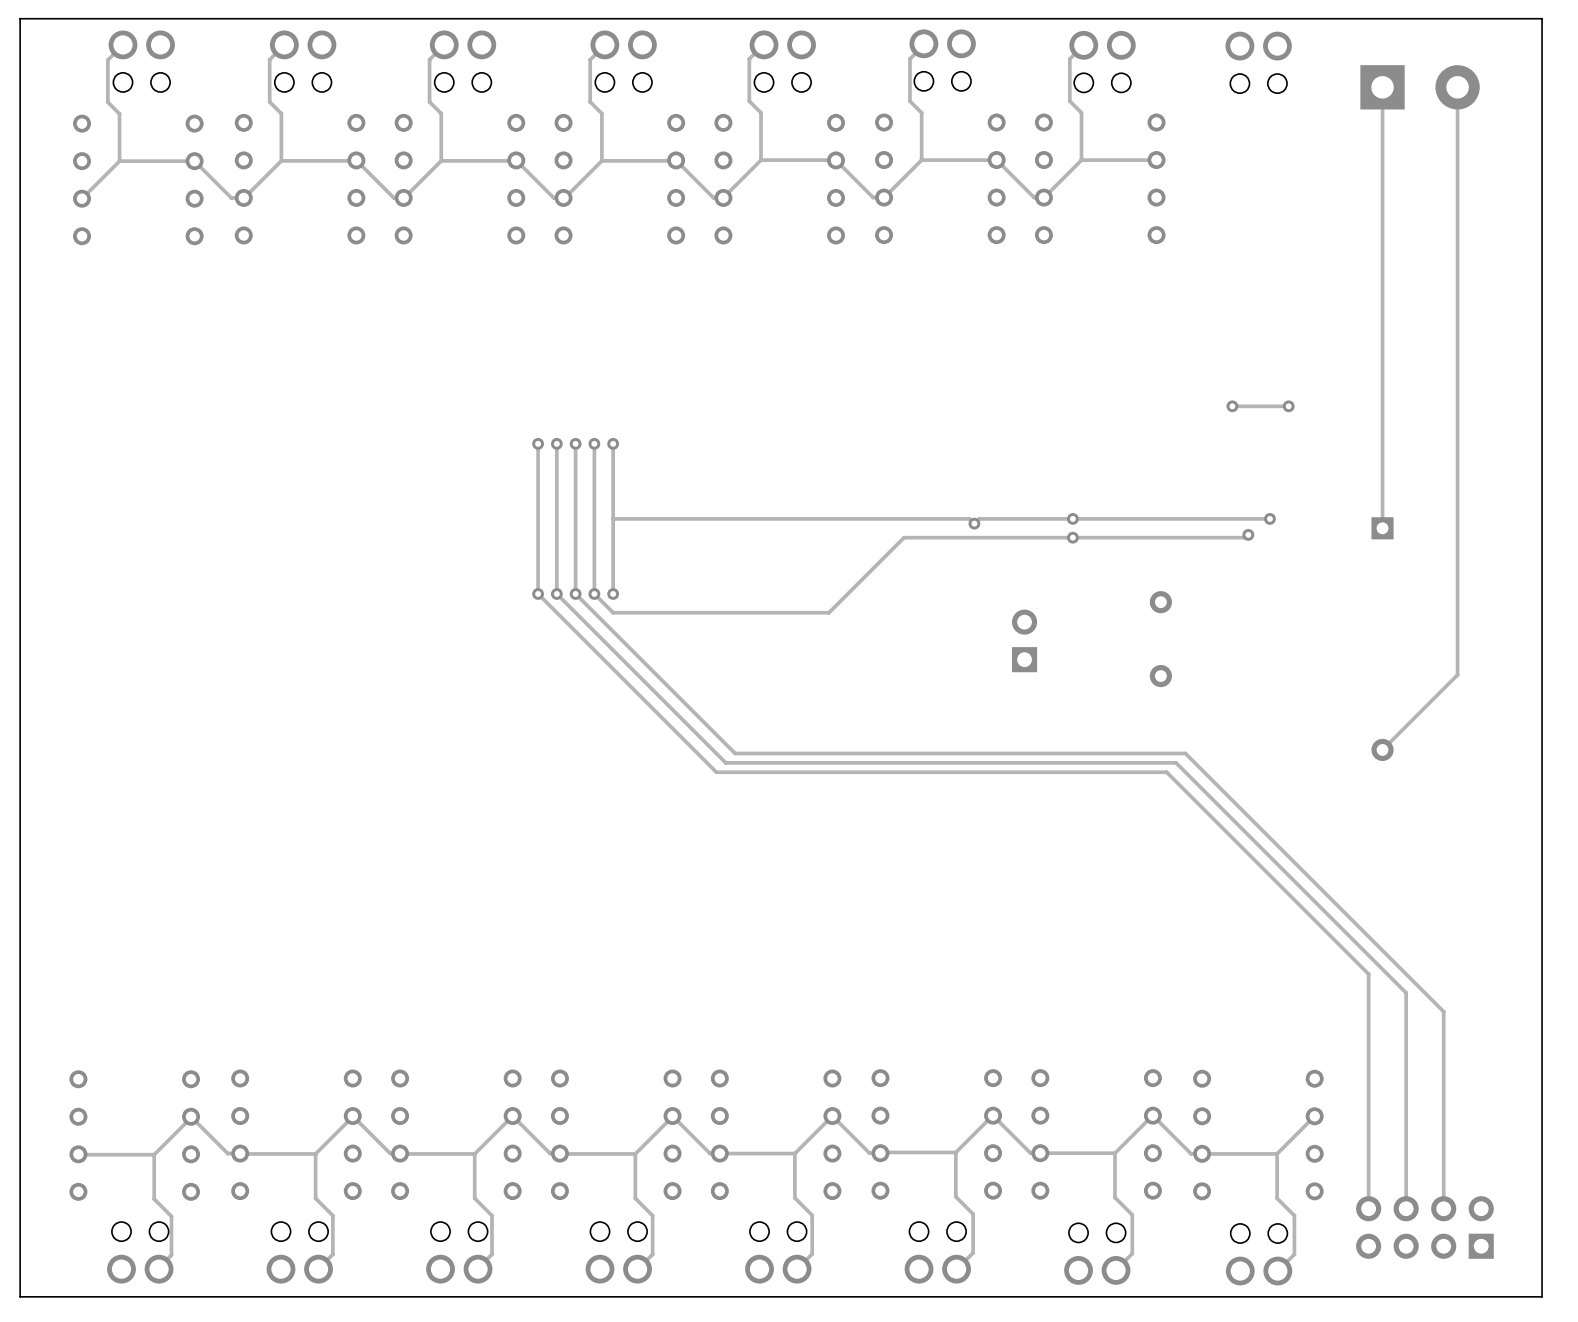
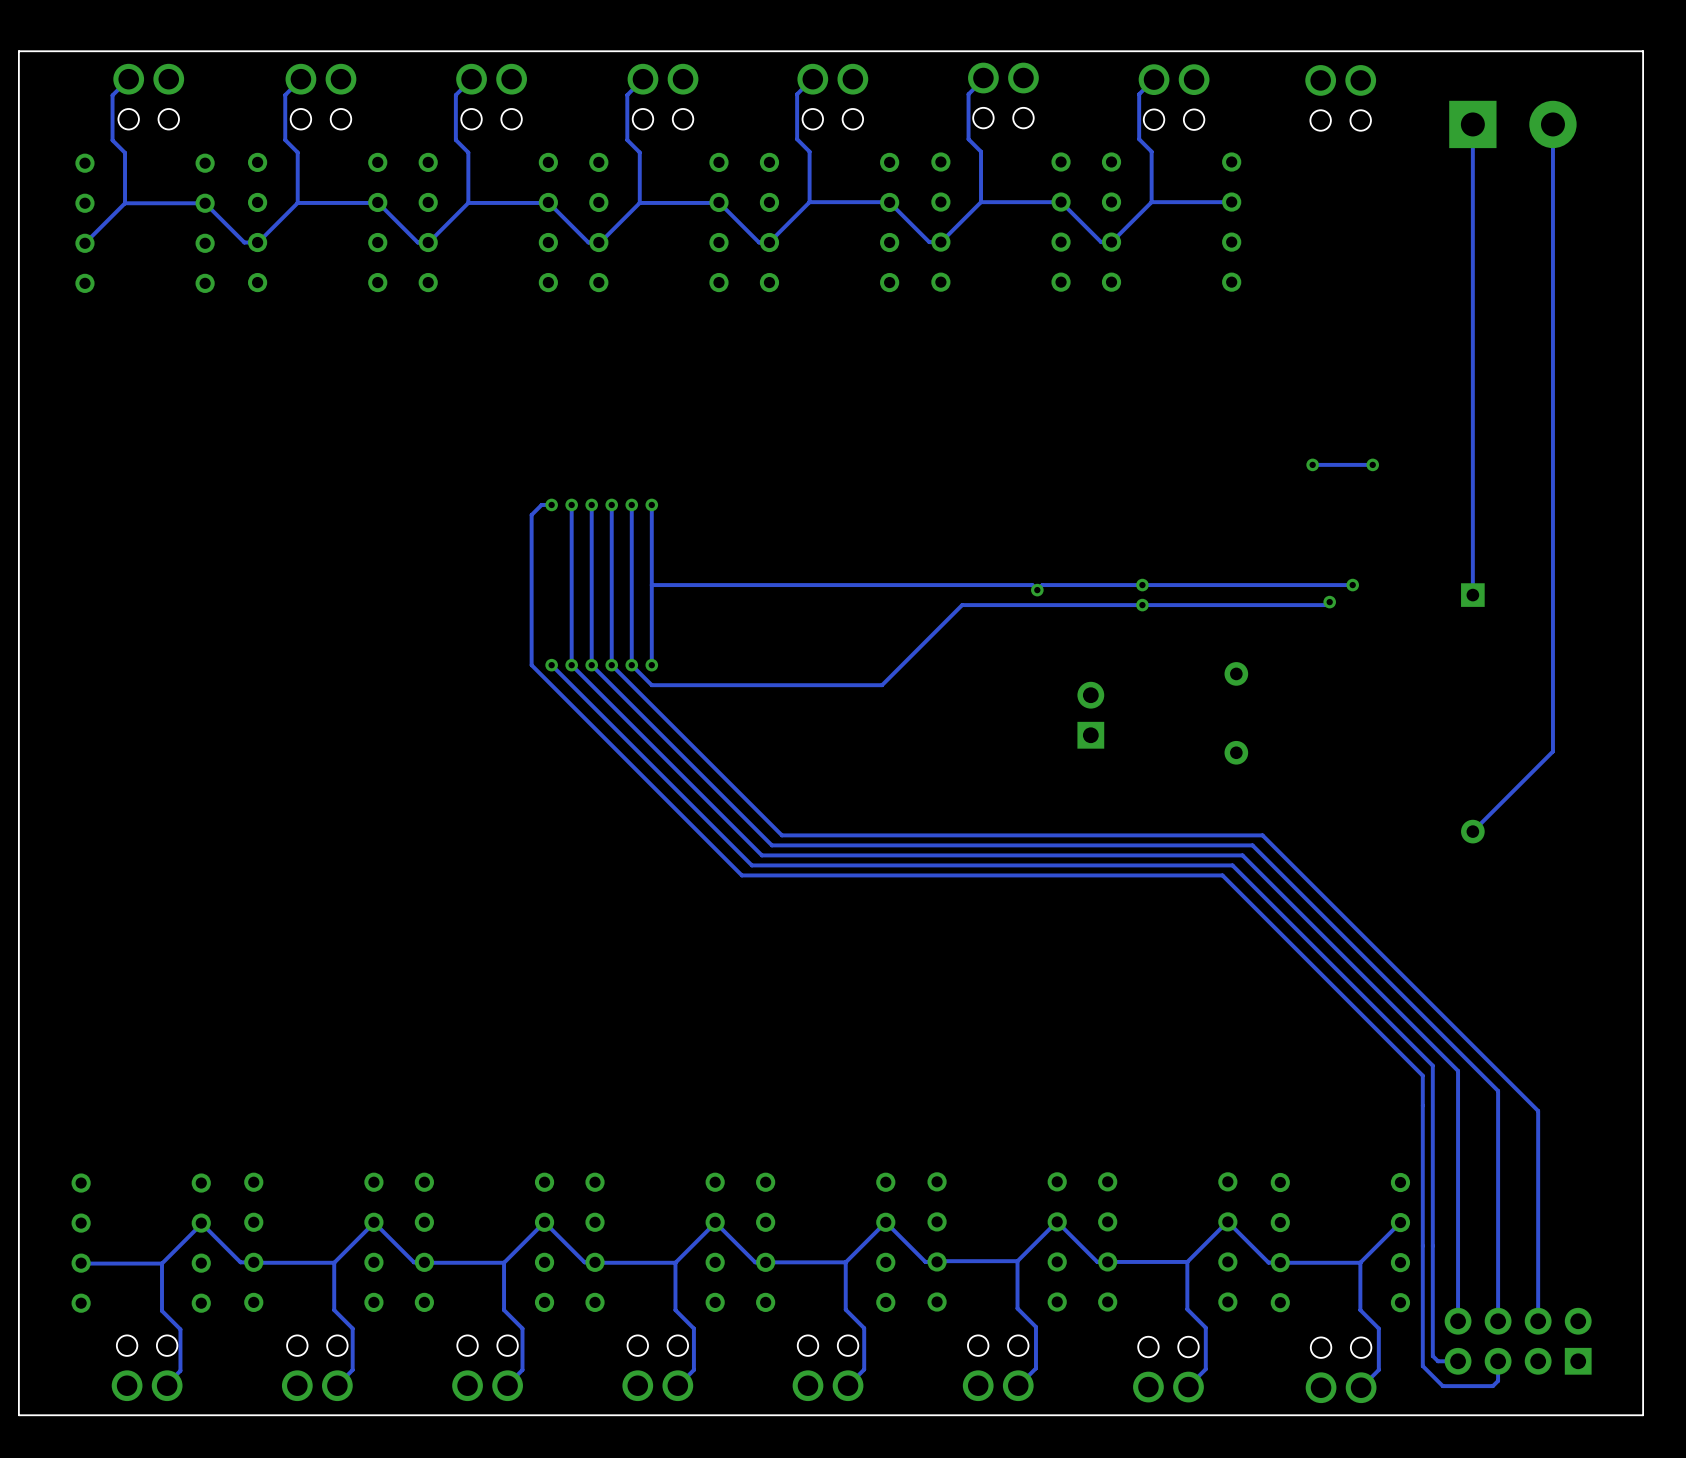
track: none -> (551, 504) (541, 504) (531, 514) (531, 665) (741, 875) (1222, 875) (1422, 1075) (1422, 1366) (1442, 1386) (1492, 1386) (1498, 1380) (1498, 1361)
via: none -> (551, 504)
track: none -> (551, 665) (751, 865) (1232, 865) (1432, 1065) (1432, 1356) (1438, 1361) (1458, 1361)
via: none -> (551, 665)

